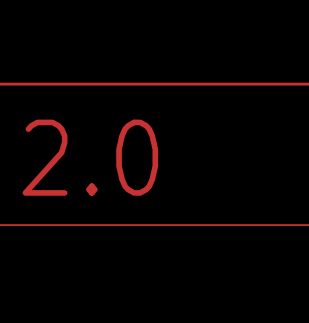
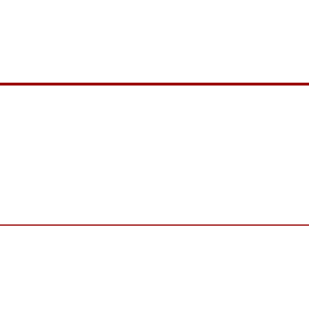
text: 2.0 (90, 157) -> none

